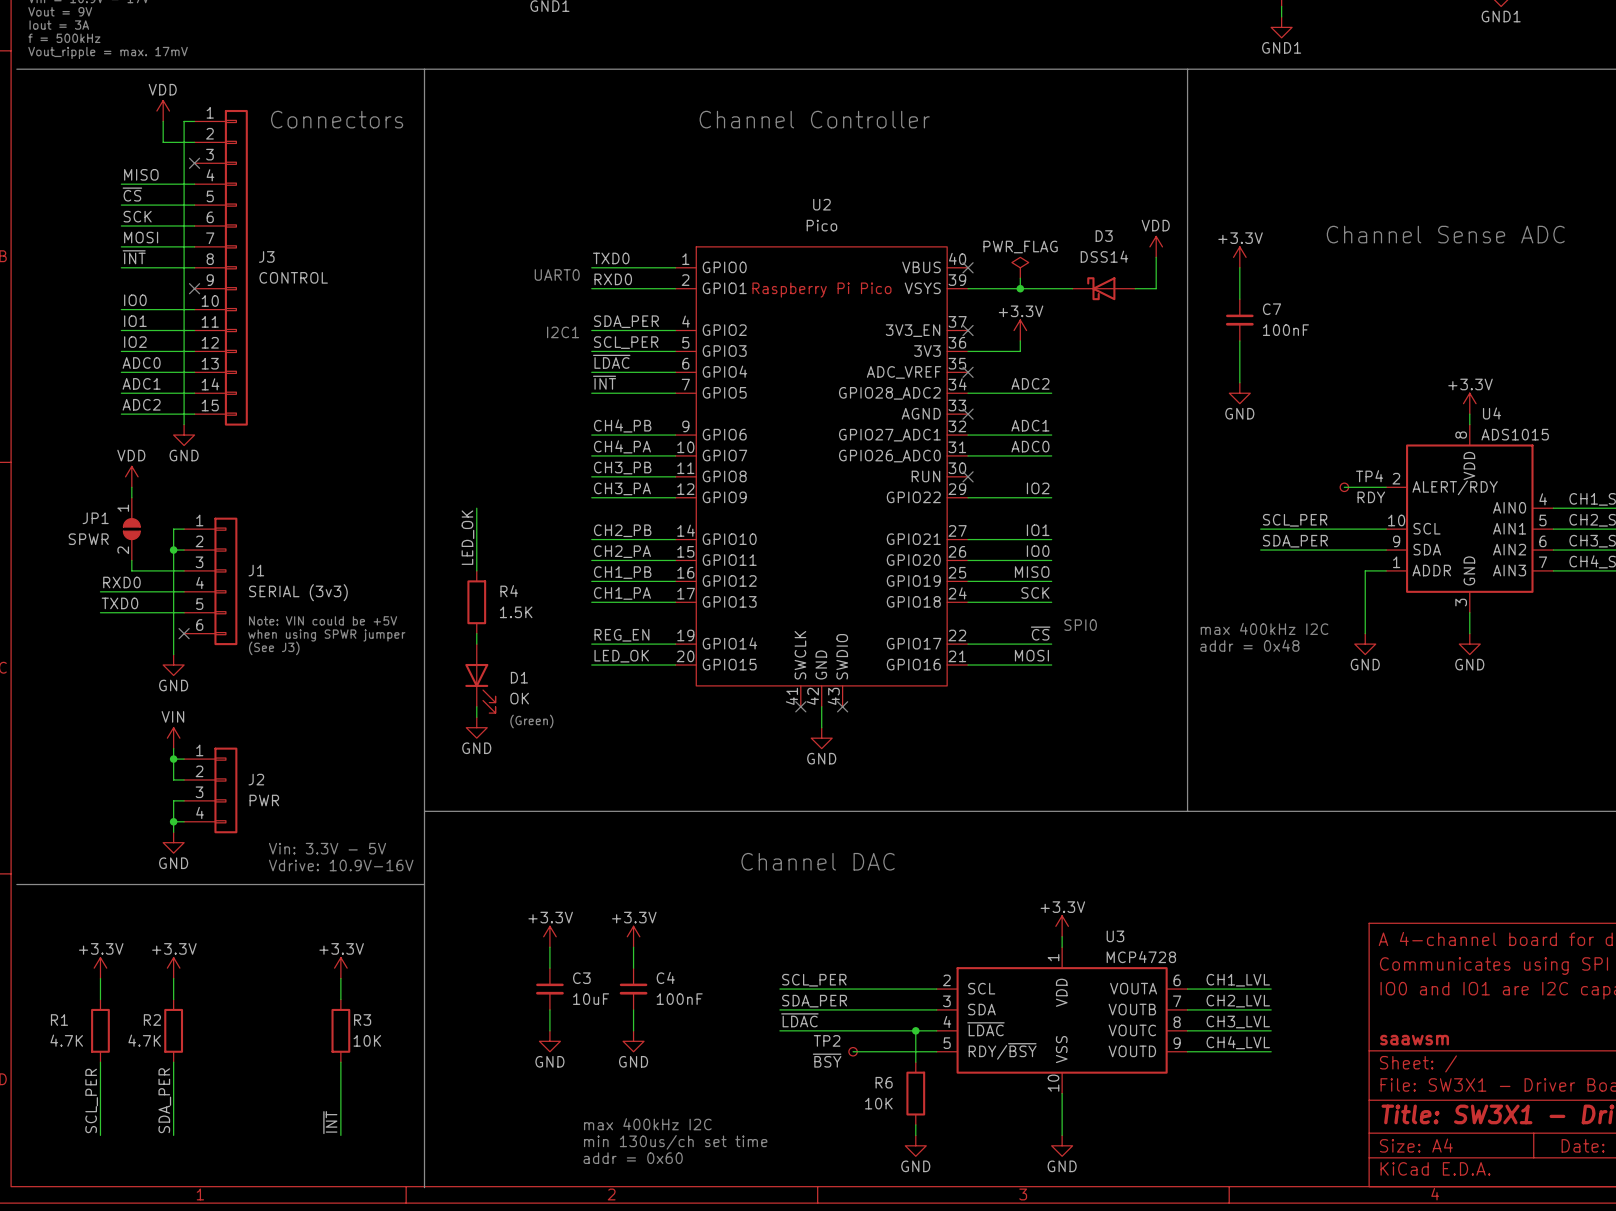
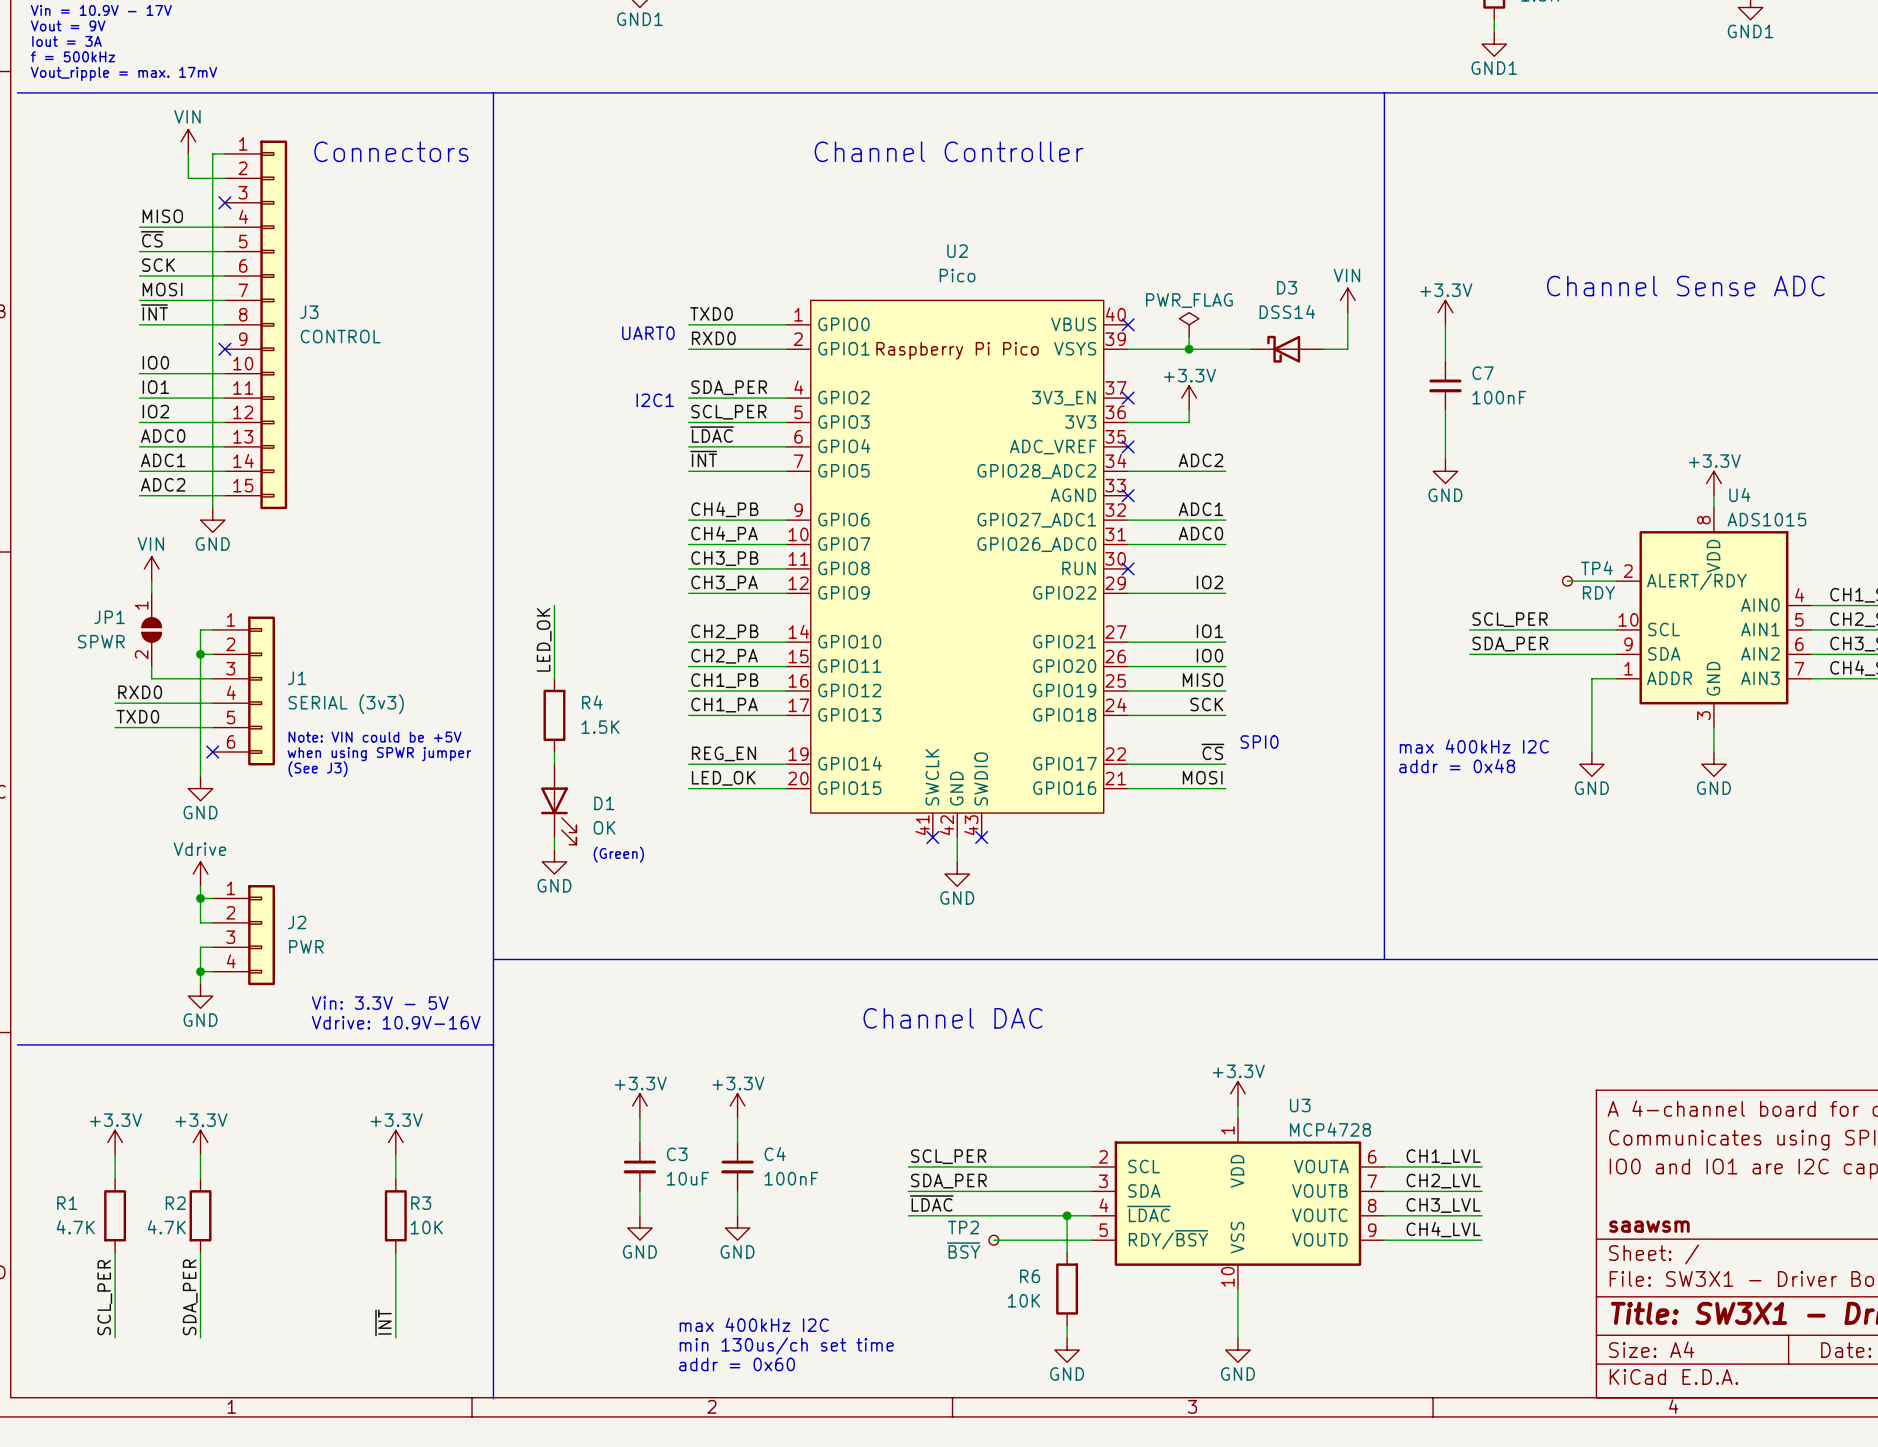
power symbol: VDD (163, 111) -> VIN (188, 141)
power symbol: VDD (1156, 246) -> VIN (1347, 300)
power symbol: VDD (131, 476) -> VIN (151, 568)
power symbol: VIN (173, 738) -> Vdrive (200, 874)

